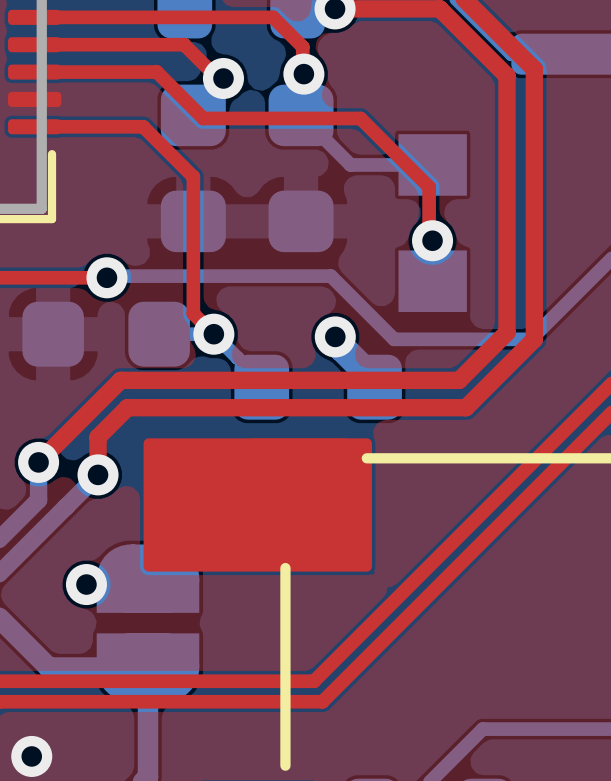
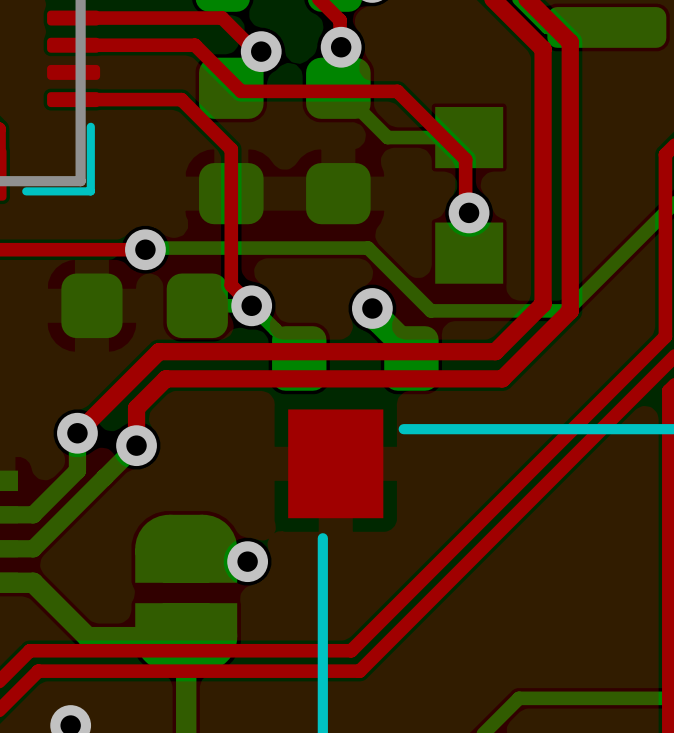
drawing: [143, 438, 372, 572] -> none
via position: (86, 584) -> (247, 561)

